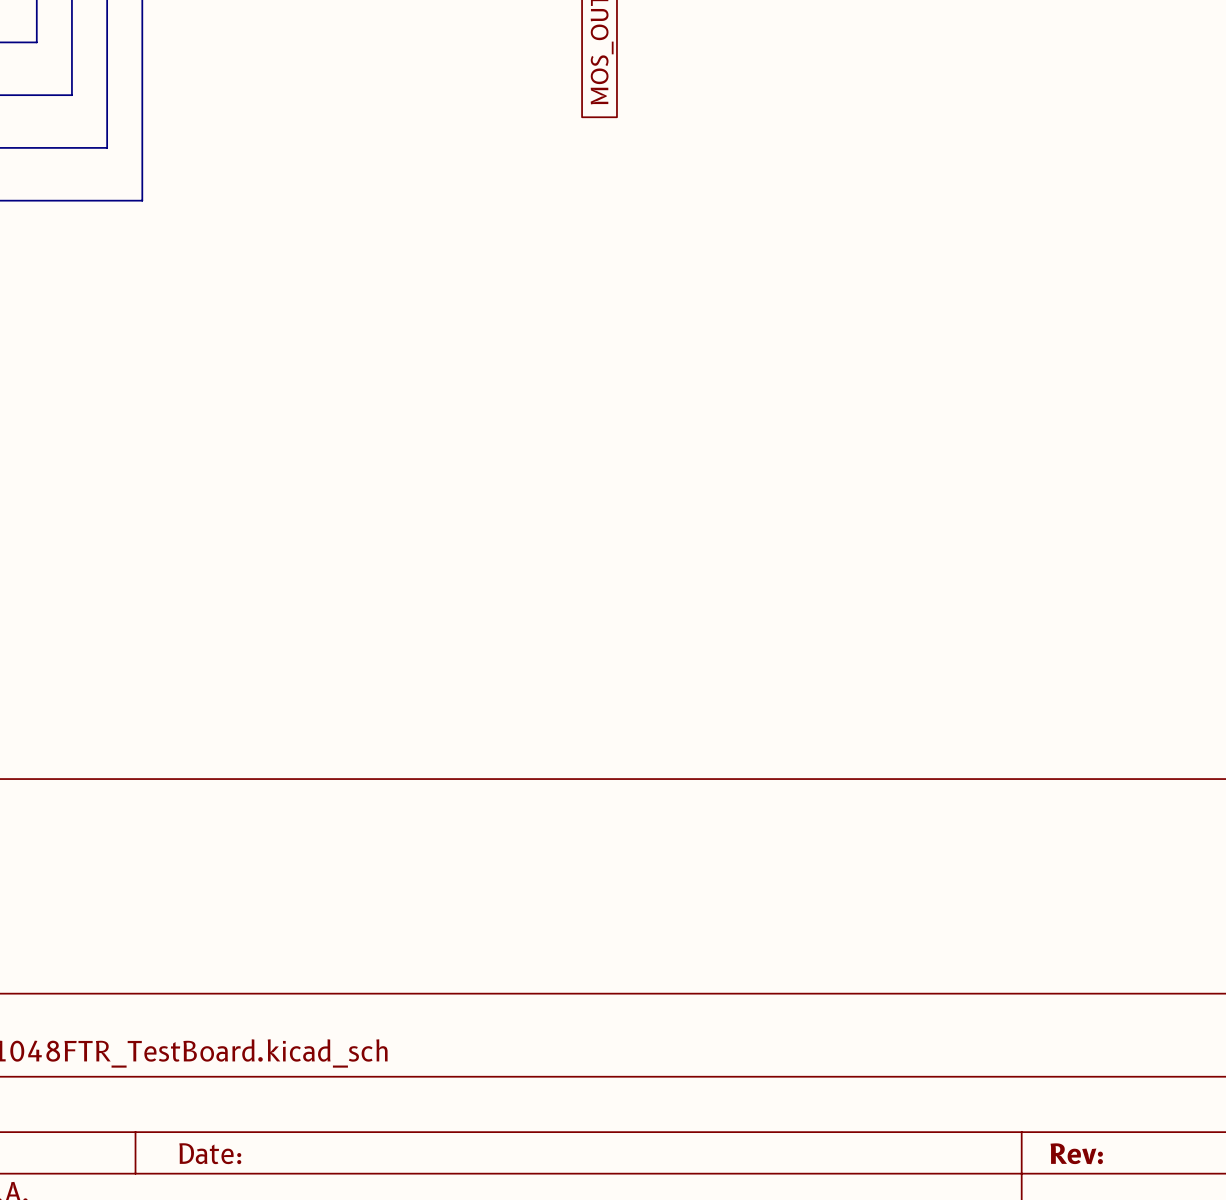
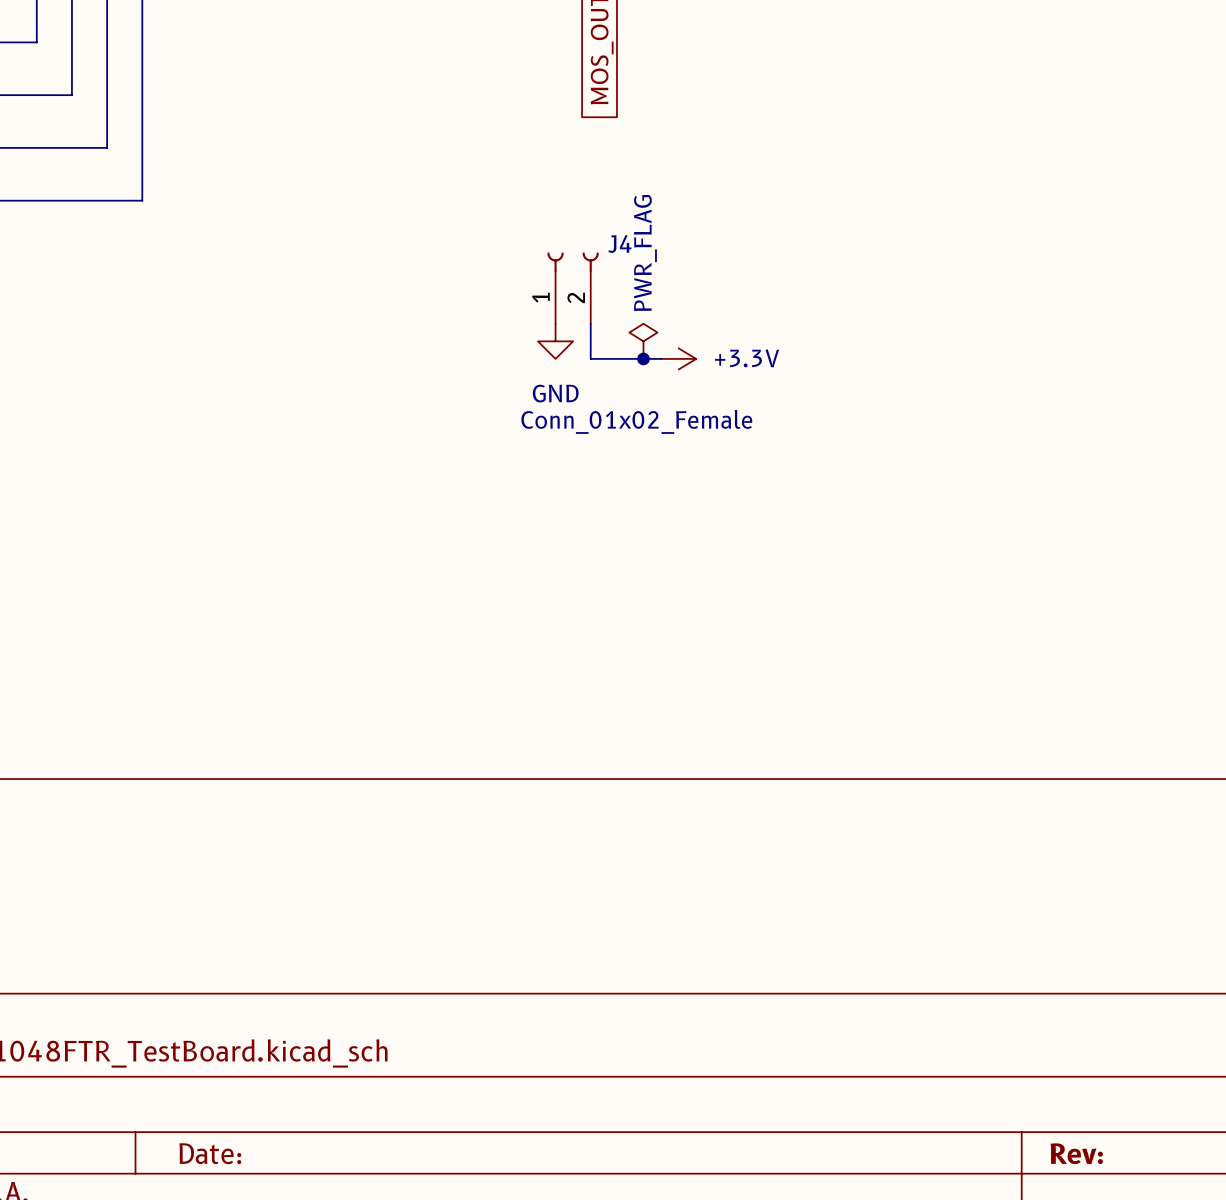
J4: none -> Conn_01x02_Female (573, 288)
wire: none -> (590, 323) (590, 358) (661, 358)
power symbol: none -> GND (555, 341)
power symbol: none -> PWR_FLAG (643, 341)
junction: none -> (643, 358)
power symbol: none -> +3.3V (678, 358)

